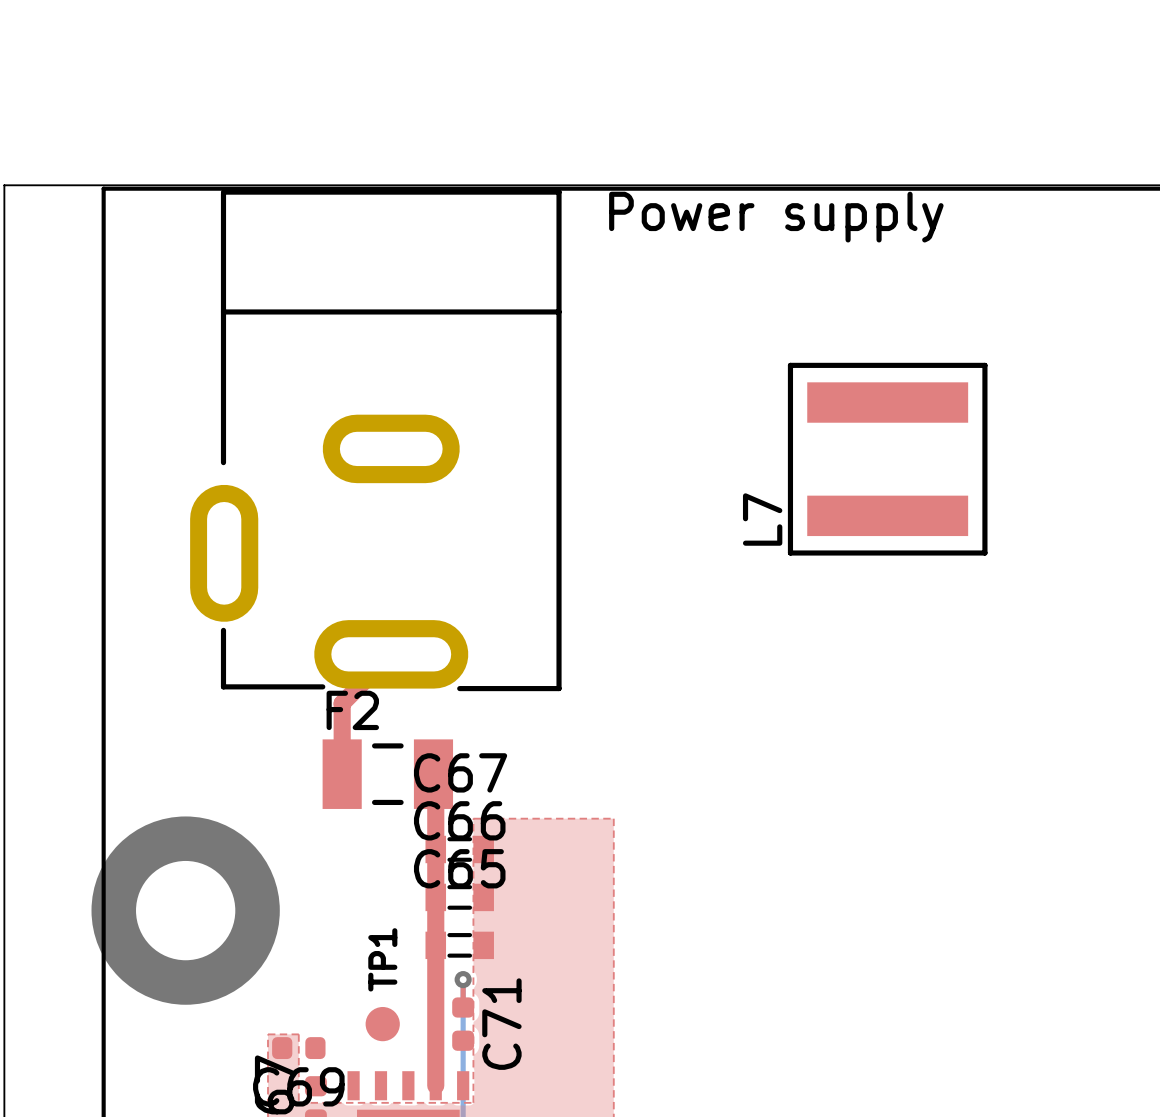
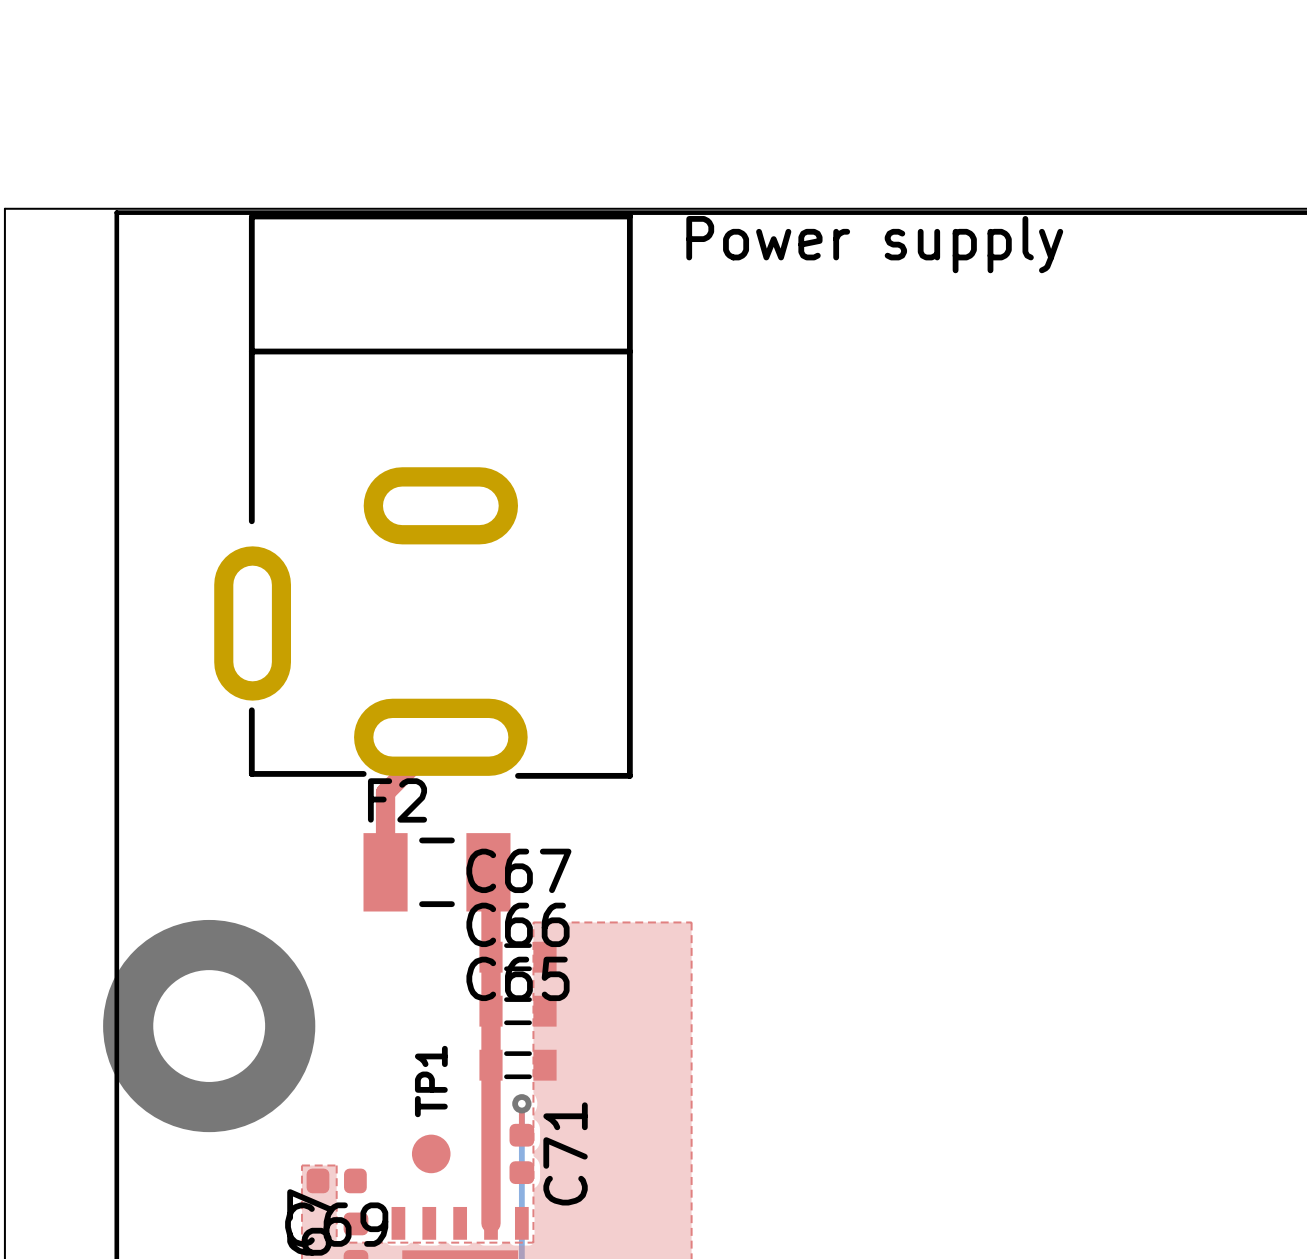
L7: (887, 459) -> none

